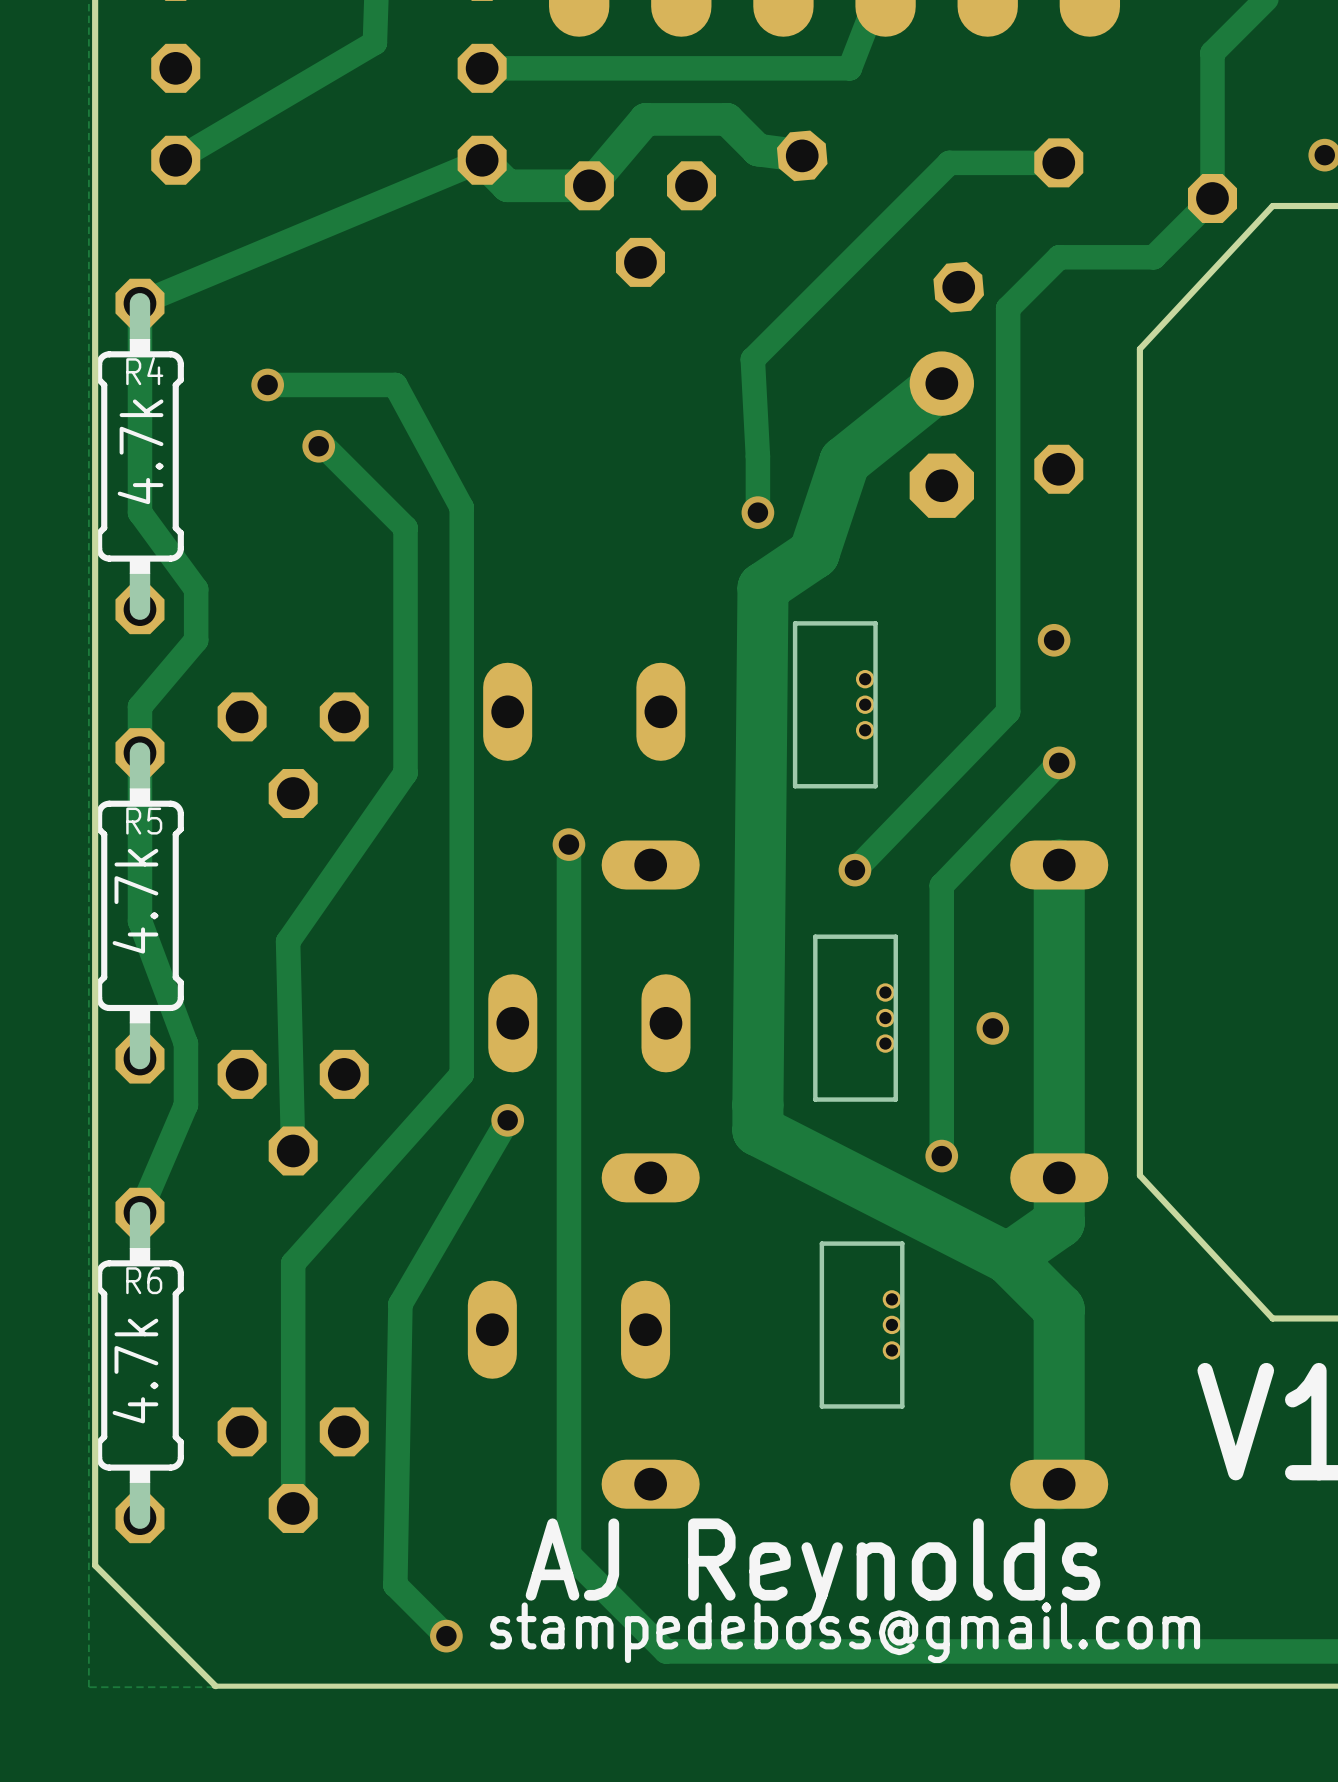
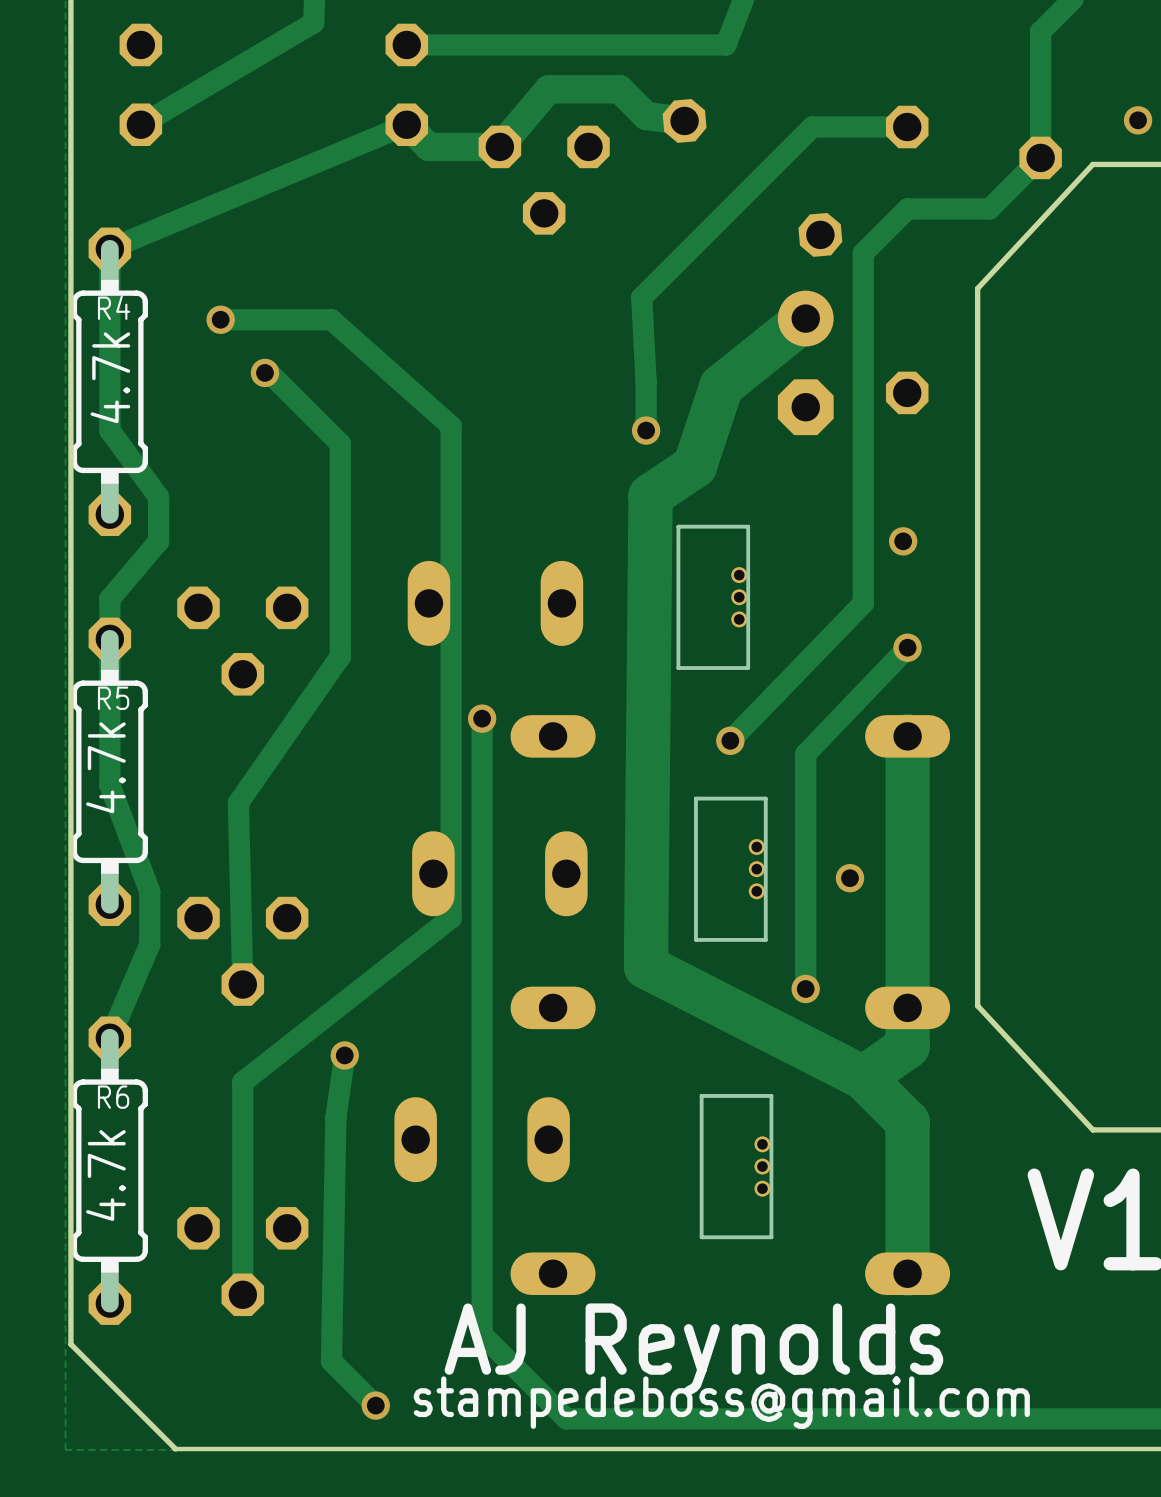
track: (395, 384) (461, 507) (461, 1074) (293, 1263) -> (331, 319) (451, 426) (451, 918) (242, 1082)
track: (507, 1120) (400, 1304) -> (344, 1055) (335, 1117)
via position: (507, 1120) -> (344, 1055)
part position: (862, 1325) -> (736, 1166)

